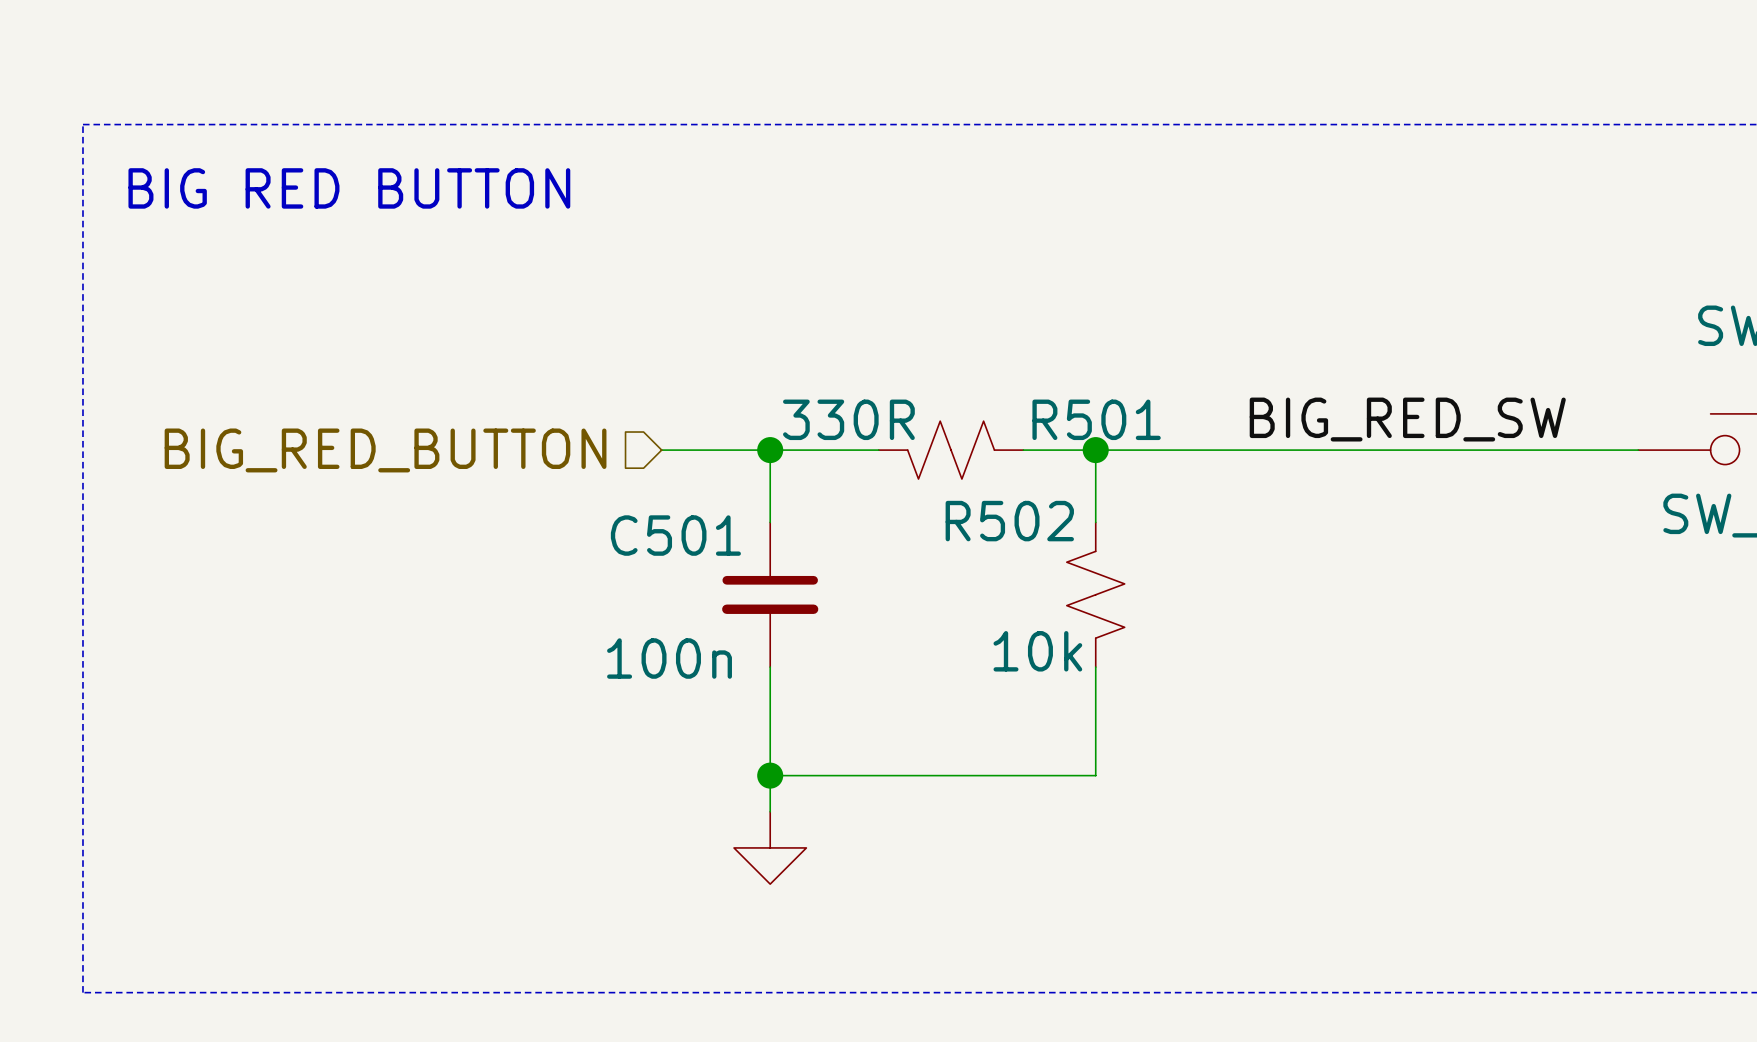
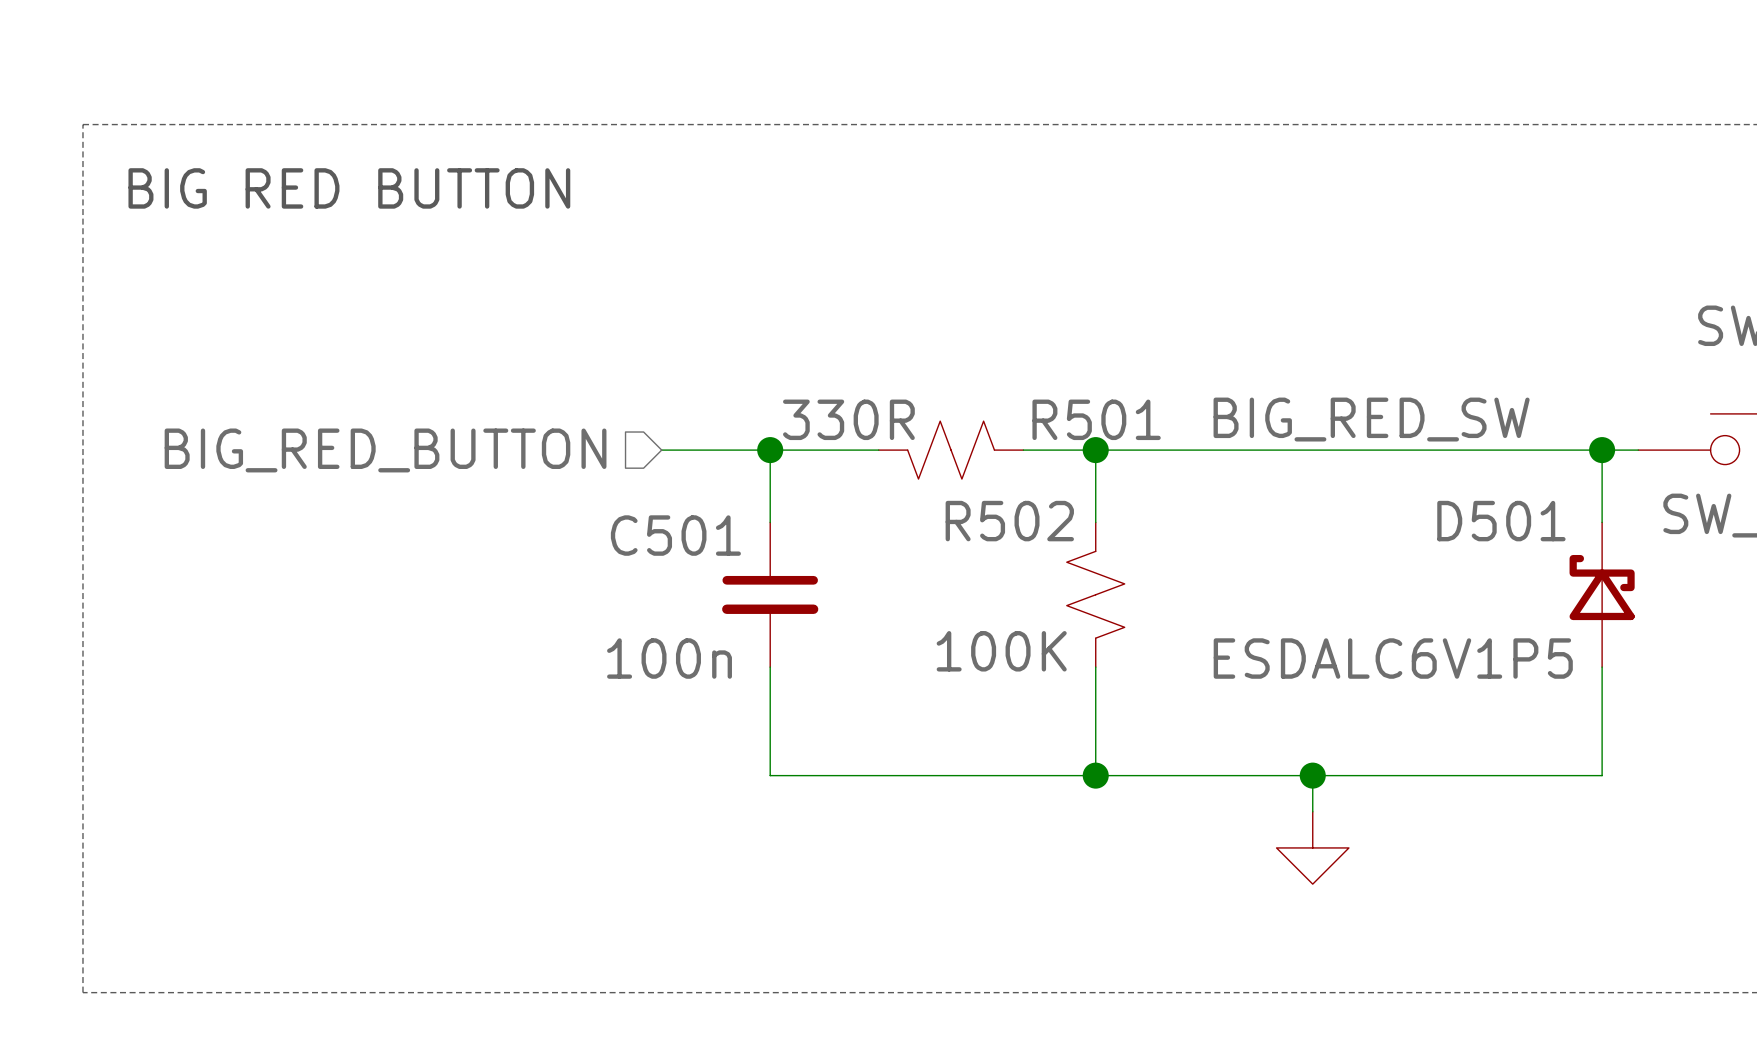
label position: BIG_RED_SW (1407, 419) -> BIG_RED_SW (1371, 419)
wire: none -> (1602, 450) (1602, 522)
junction: none -> (1602, 450)
D501: none -> ESDALC6V1P5 (1602, 594)
R502 value: 10k (1037, 651) -> 100K (1001, 651)
wire: none -> (1602, 667) (1602, 775) (1095, 775)
wire: (770, 775) (770, 811) -> (1312, 775) (1312, 811)
junction: (770, 775) -> none
junction: none -> (1095, 775)
junction: none -> (1312, 775)
power symbol position: (770, 847) -> (1312, 847)

